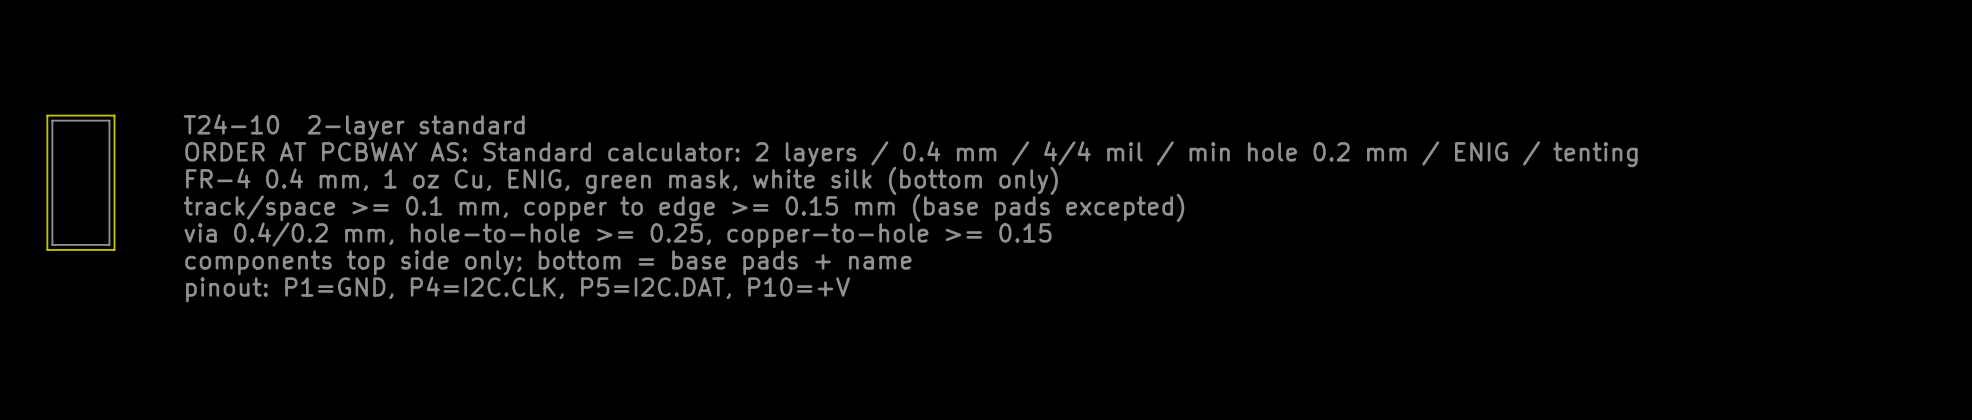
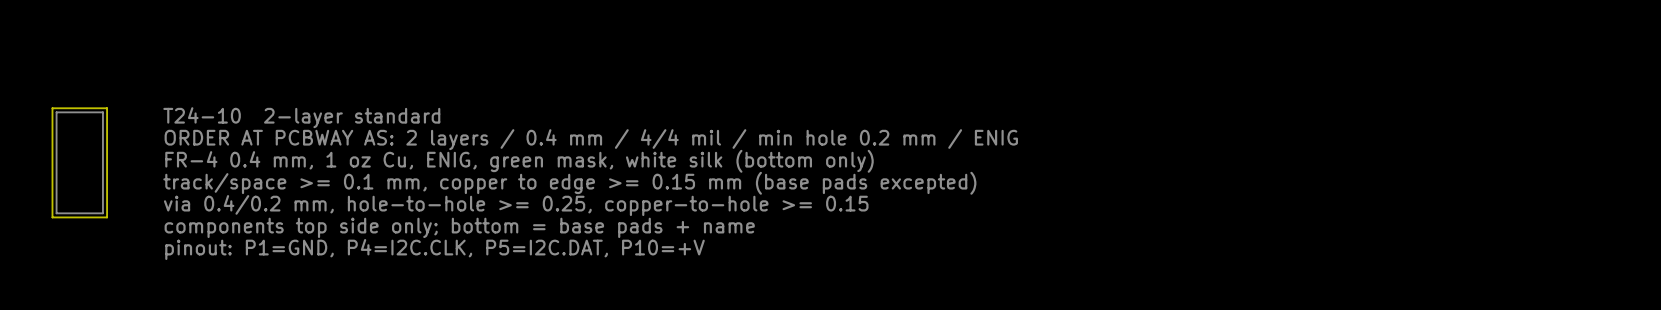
text: ORDER AT PCBWAY AS: Standard calculator: 2 layers / 0.4 mm / 4/4 mil / min hole 0.2 mm / ENIG / tenting (911, 154) -> ORDER AT PCBWAY AS: 2 layers / 0.4 mm / 4/4 mil / min hole 0.2 mm / ENIG (591, 139)

